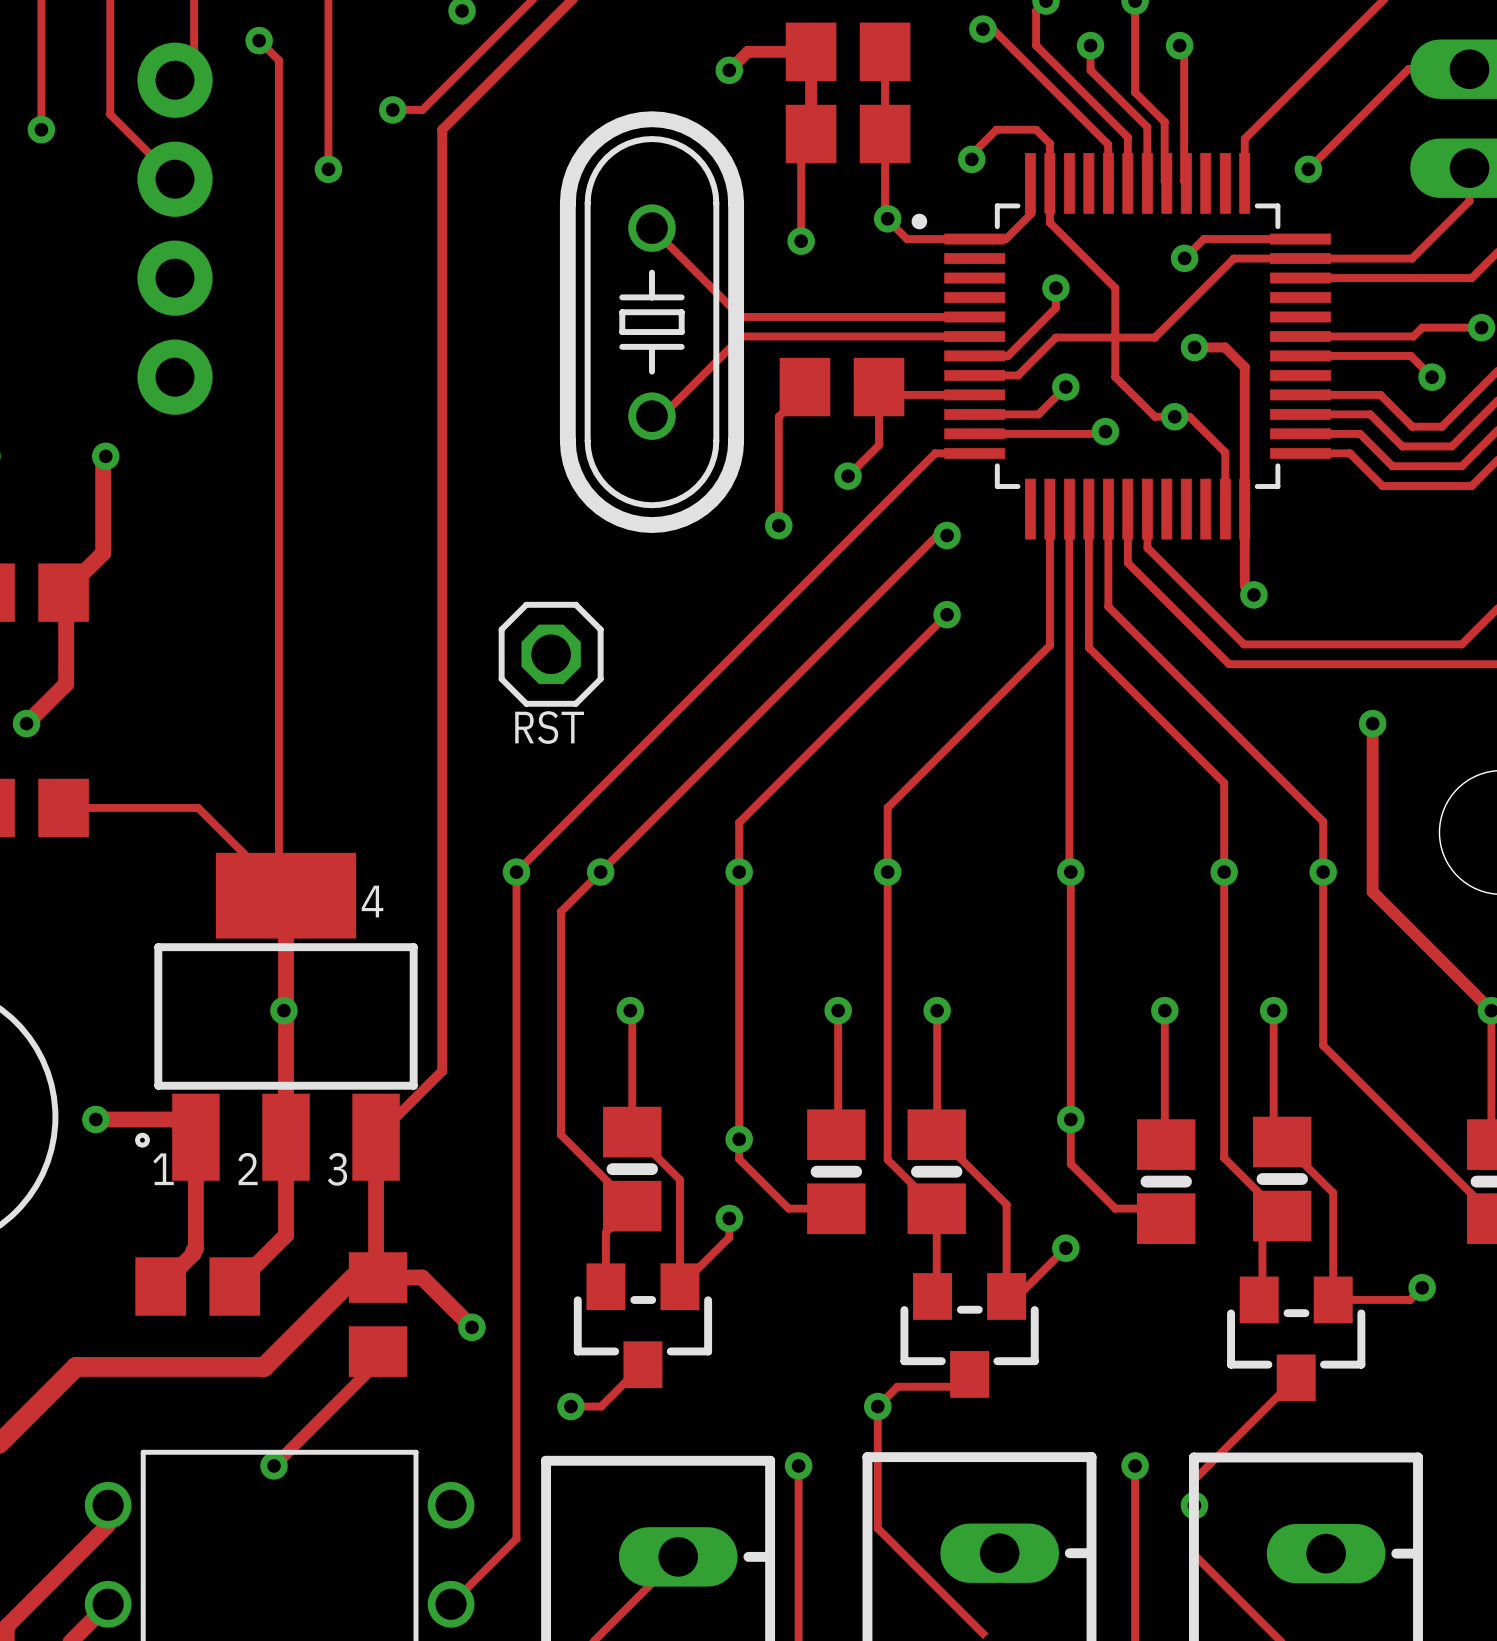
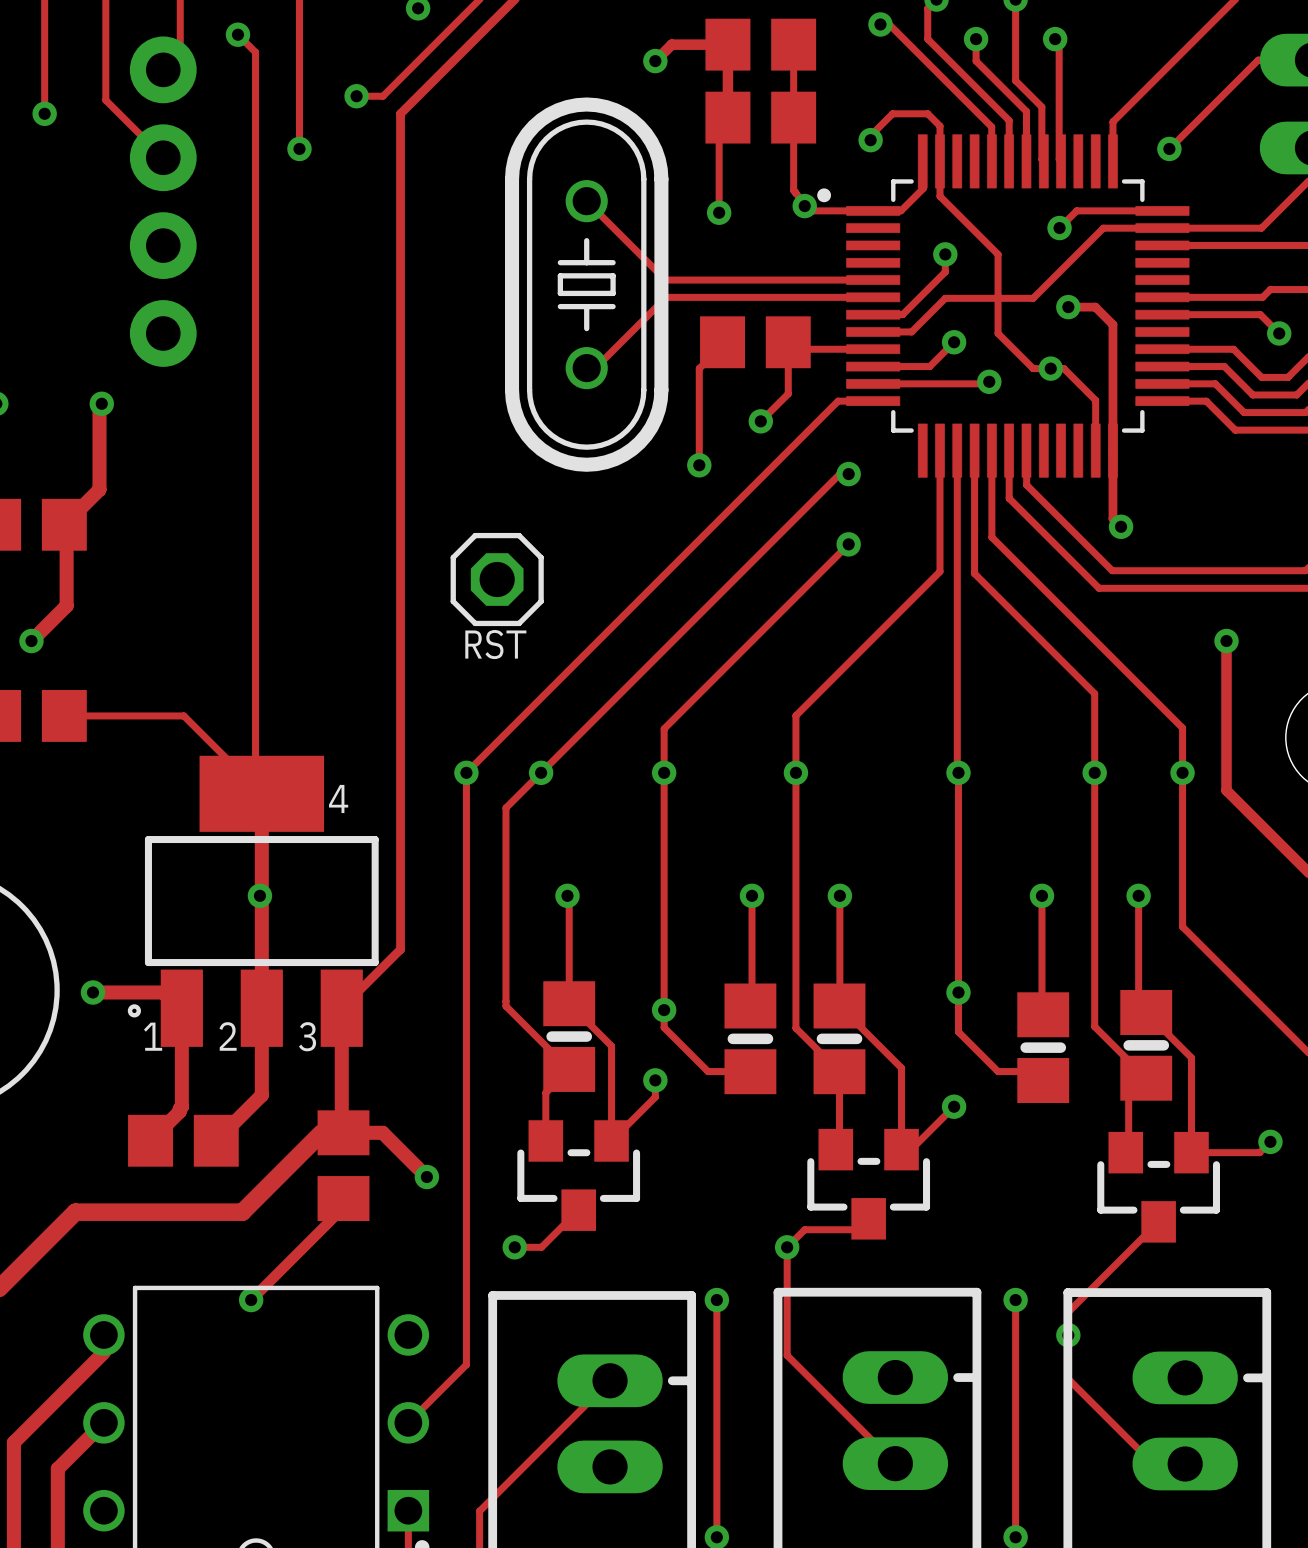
via position: (887, 218) -> (804, 206)

